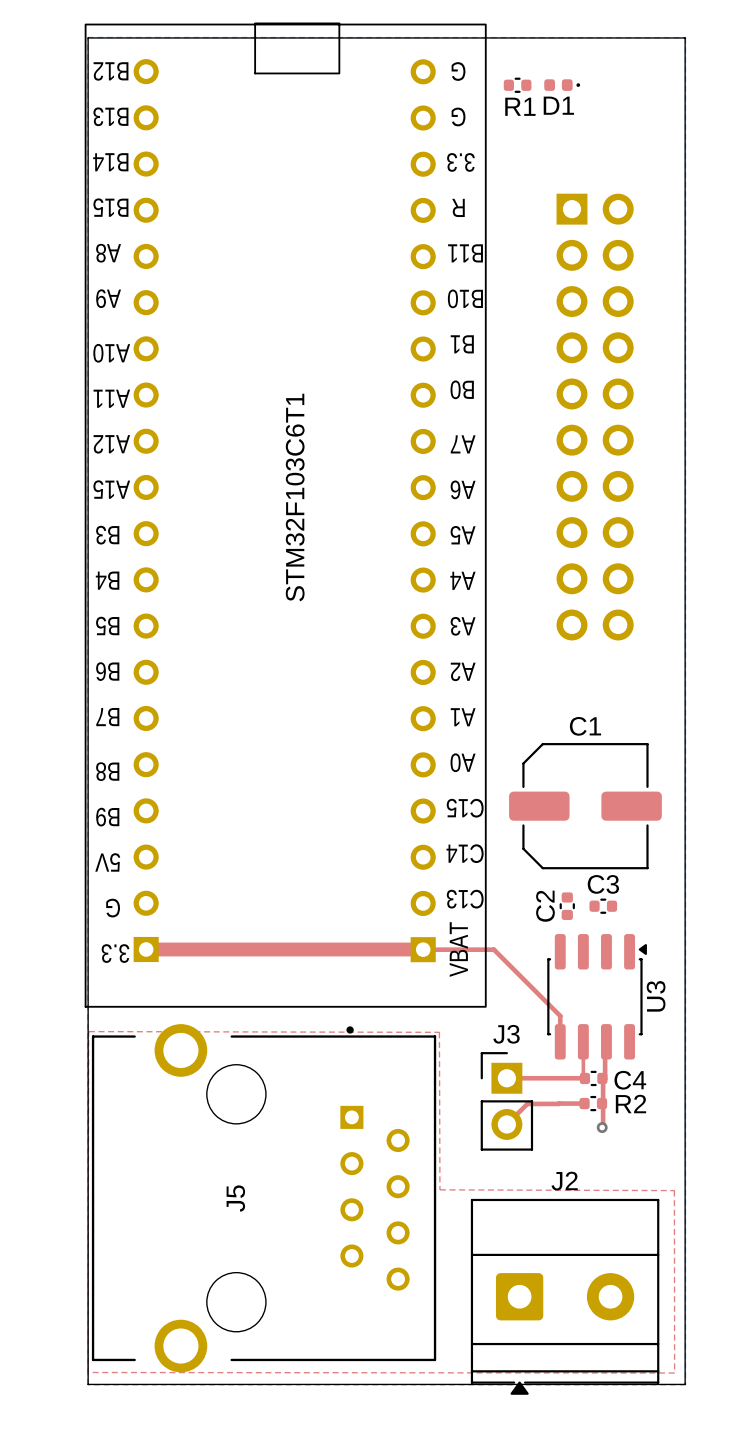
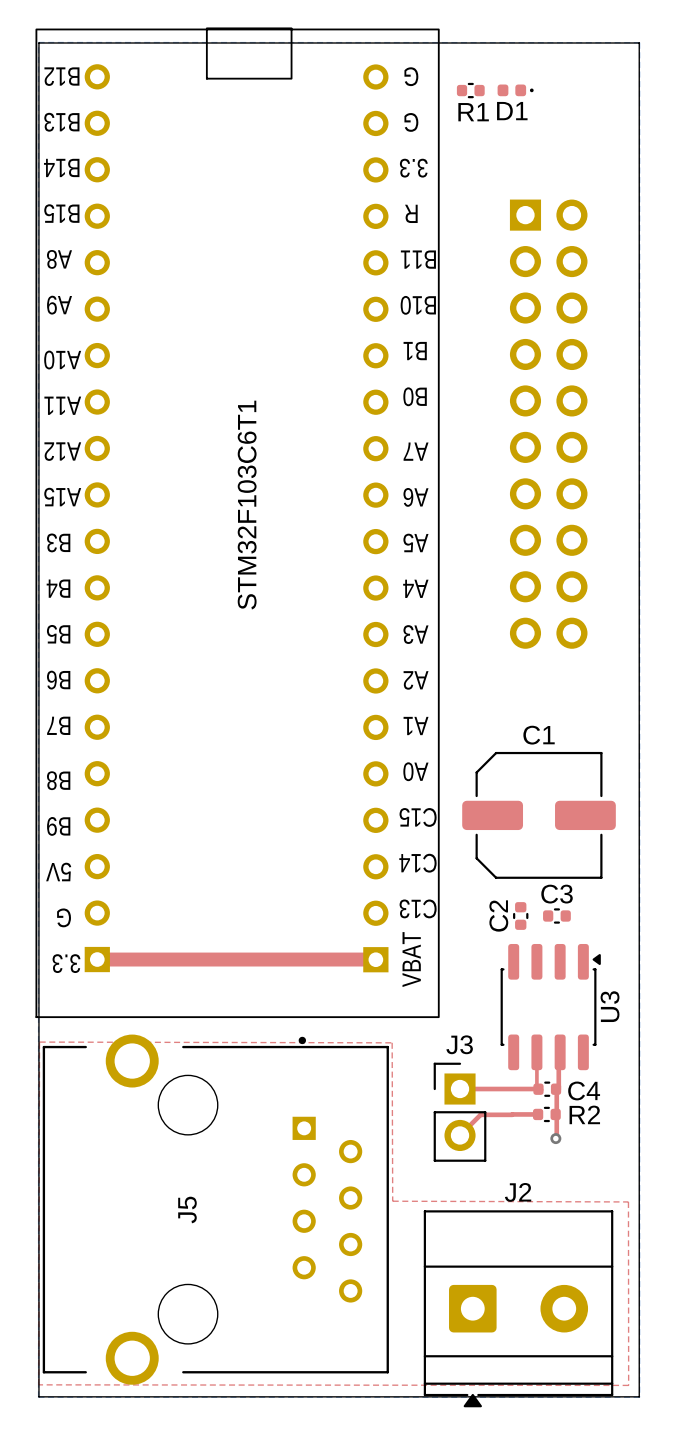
top track: (423, 949) (493, 949) (560, 1015) (560, 1041) -> none

